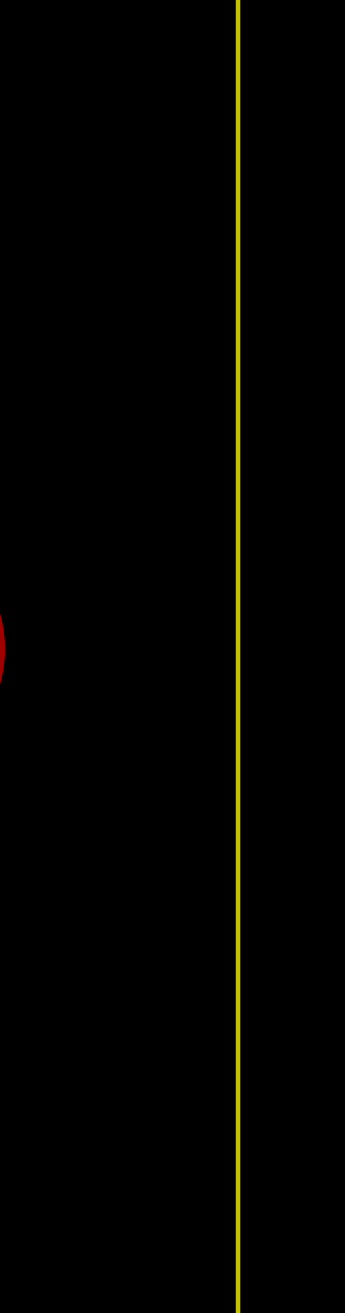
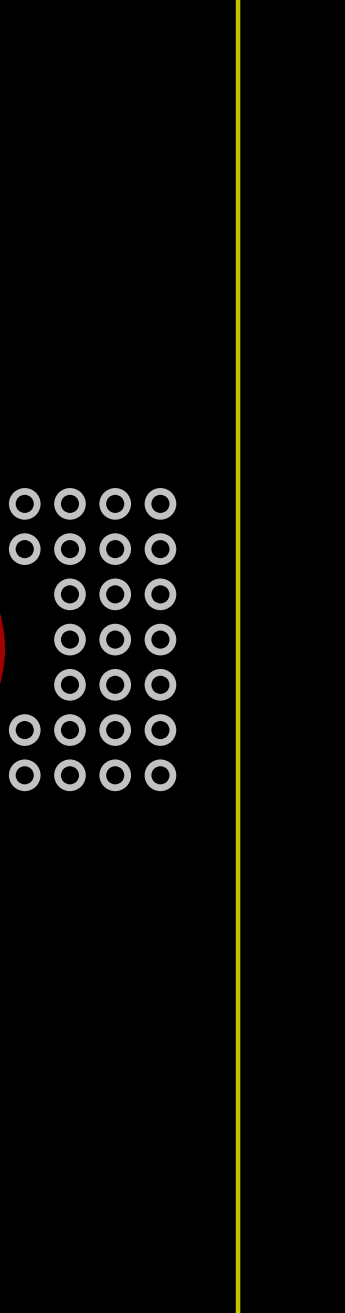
via: none -> (24, 503)
via: none -> (69, 503)
via: none -> (115, 503)
via: none -> (160, 503)
via: none -> (24, 549)
via: none -> (69, 549)
via: none -> (115, 549)
via: none -> (160, 549)
via: none -> (69, 594)
via: none -> (115, 594)
via: none -> (160, 594)
via: none -> (69, 639)
via: none -> (115, 639)
via: none -> (160, 639)
via: none -> (69, 684)
via: none -> (115, 684)
via: none -> (160, 684)
via: none -> (24, 730)
via: none -> (69, 730)
via: none -> (115, 730)
via: none -> (160, 730)
via: none -> (24, 775)
via: none -> (69, 775)
via: none -> (115, 775)
via: none -> (160, 775)

